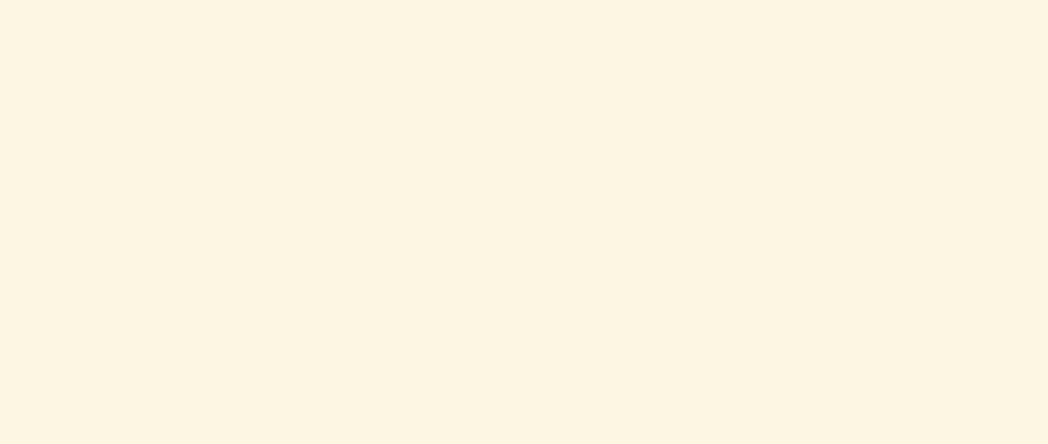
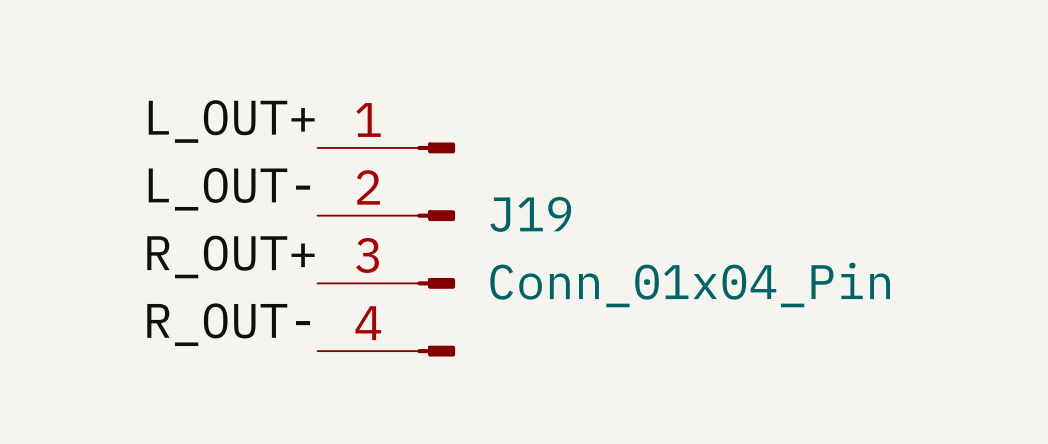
label: none -> L_OUT+ (231, 121)
label: none -> L_OUT- (229, 189)
J19: none -> Conn_01x04_Pin (386, 249)
label: none -> R_OUT+ (230, 256)
label: none -> R_OUT- (228, 324)

